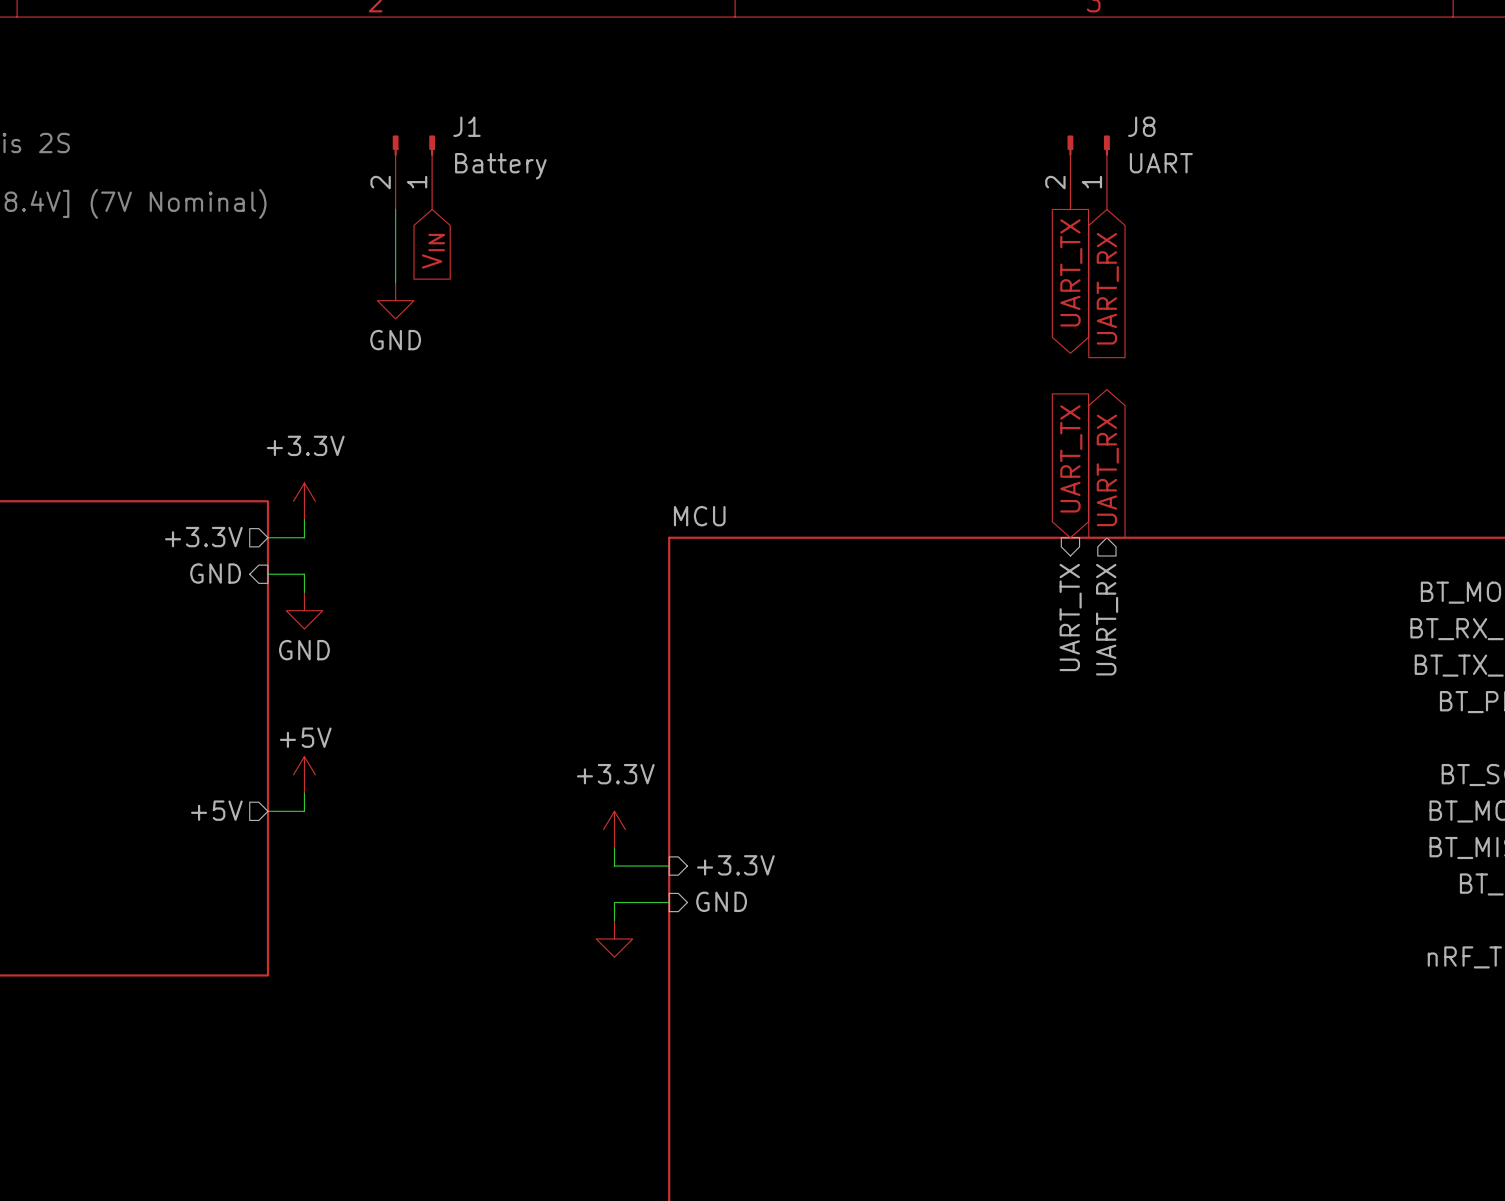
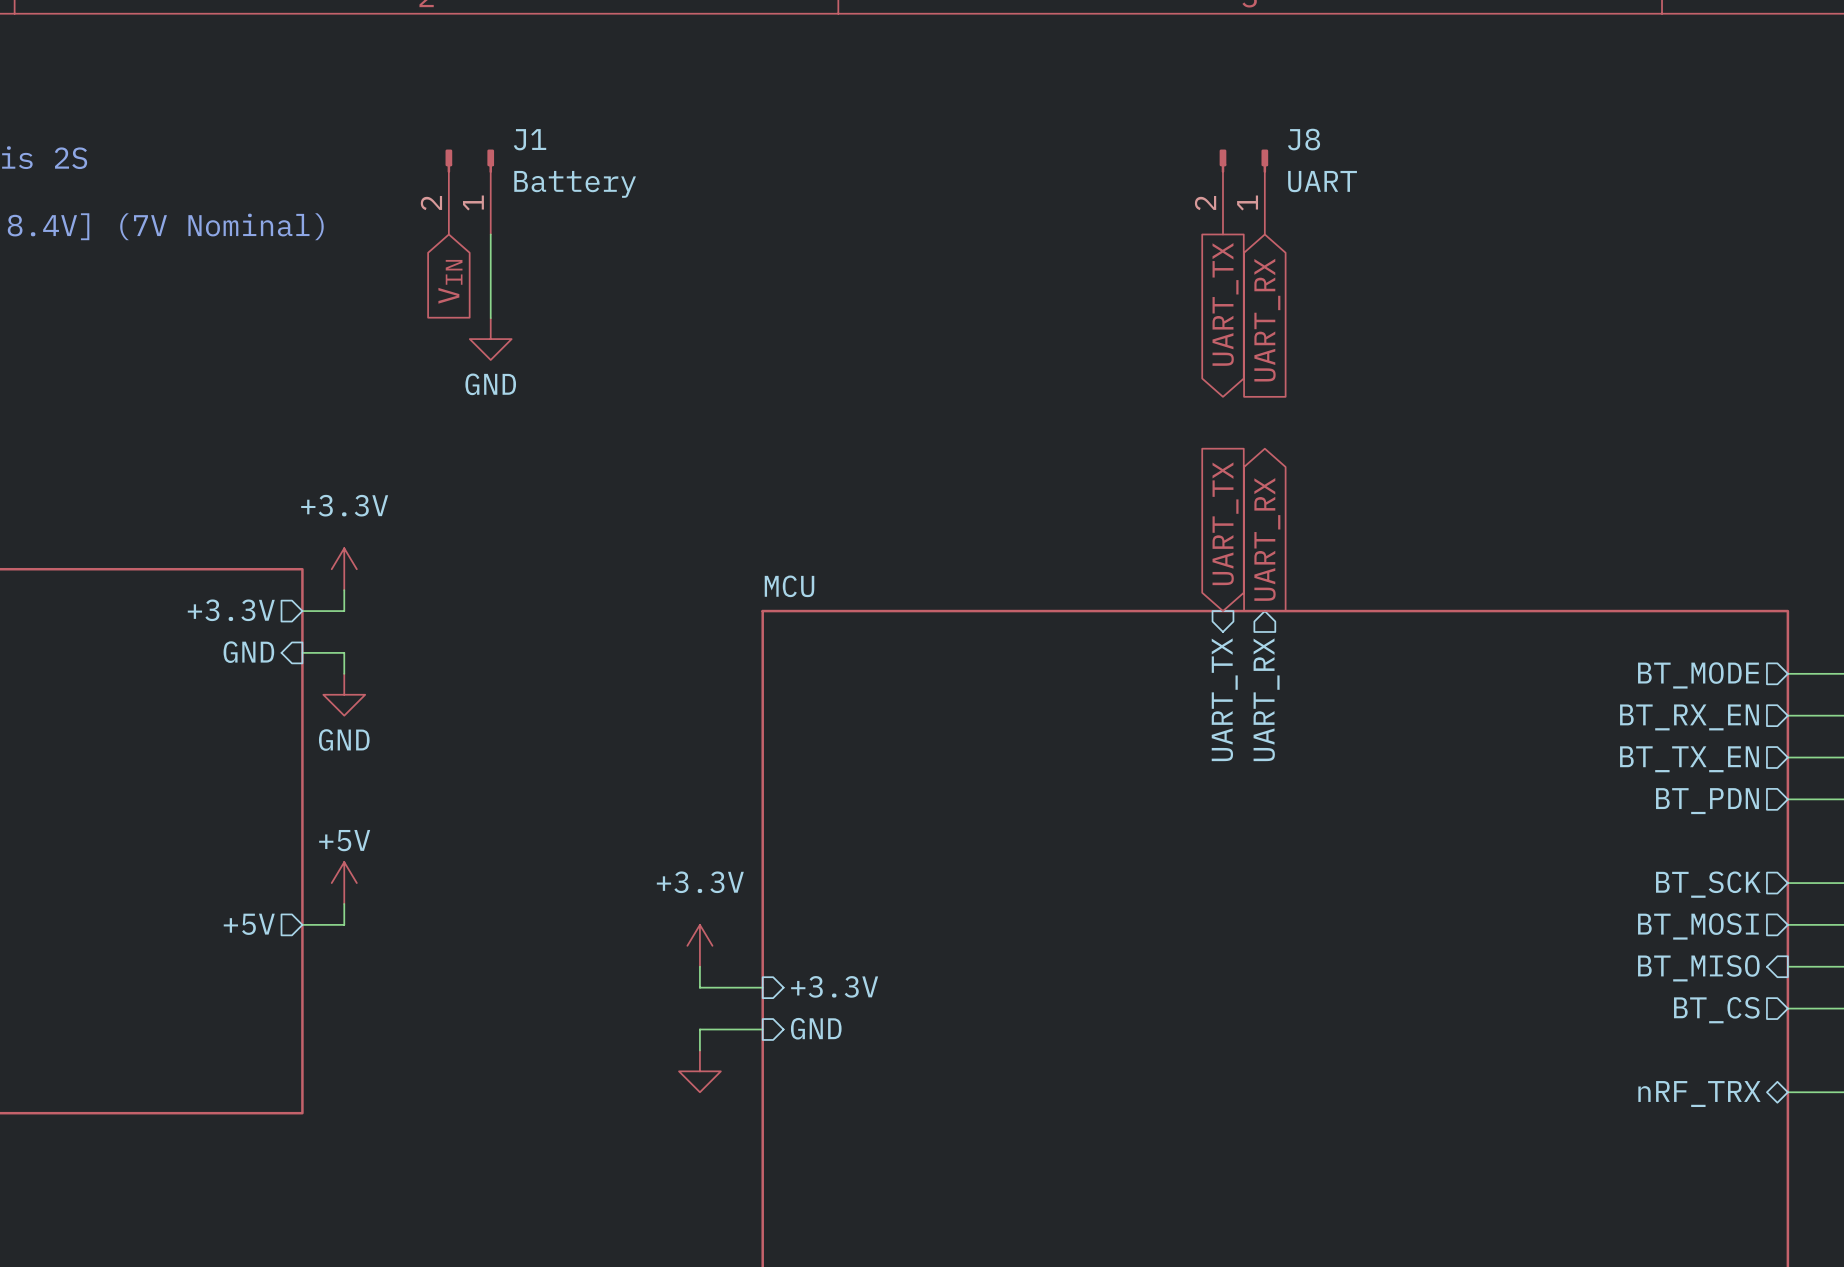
wire: (395, 209) (395, 282) -> (490, 234) (490, 318)
global label position: VIN (433, 251) -> VIN (450, 281)
power symbol position: GND (395, 300) -> GND (490, 339)

